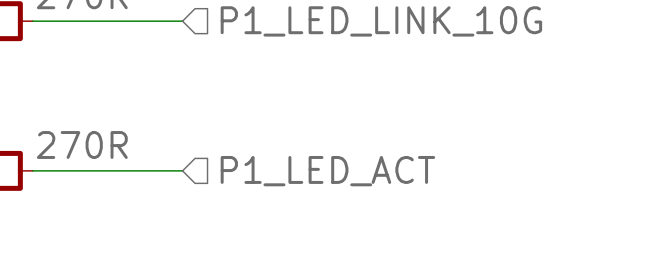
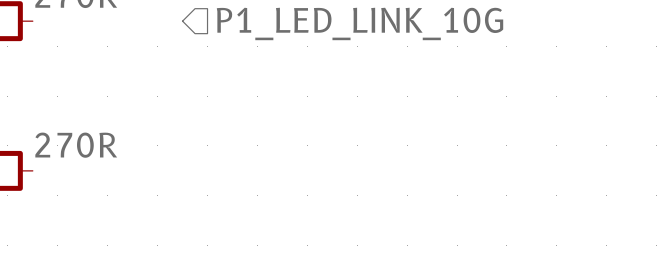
wire: (32, 21) (182, 21) -> none
wire: (32, 170) (182, 170) -> none
hierarchical label: P1_LED_ACT (327, 171) -> none

